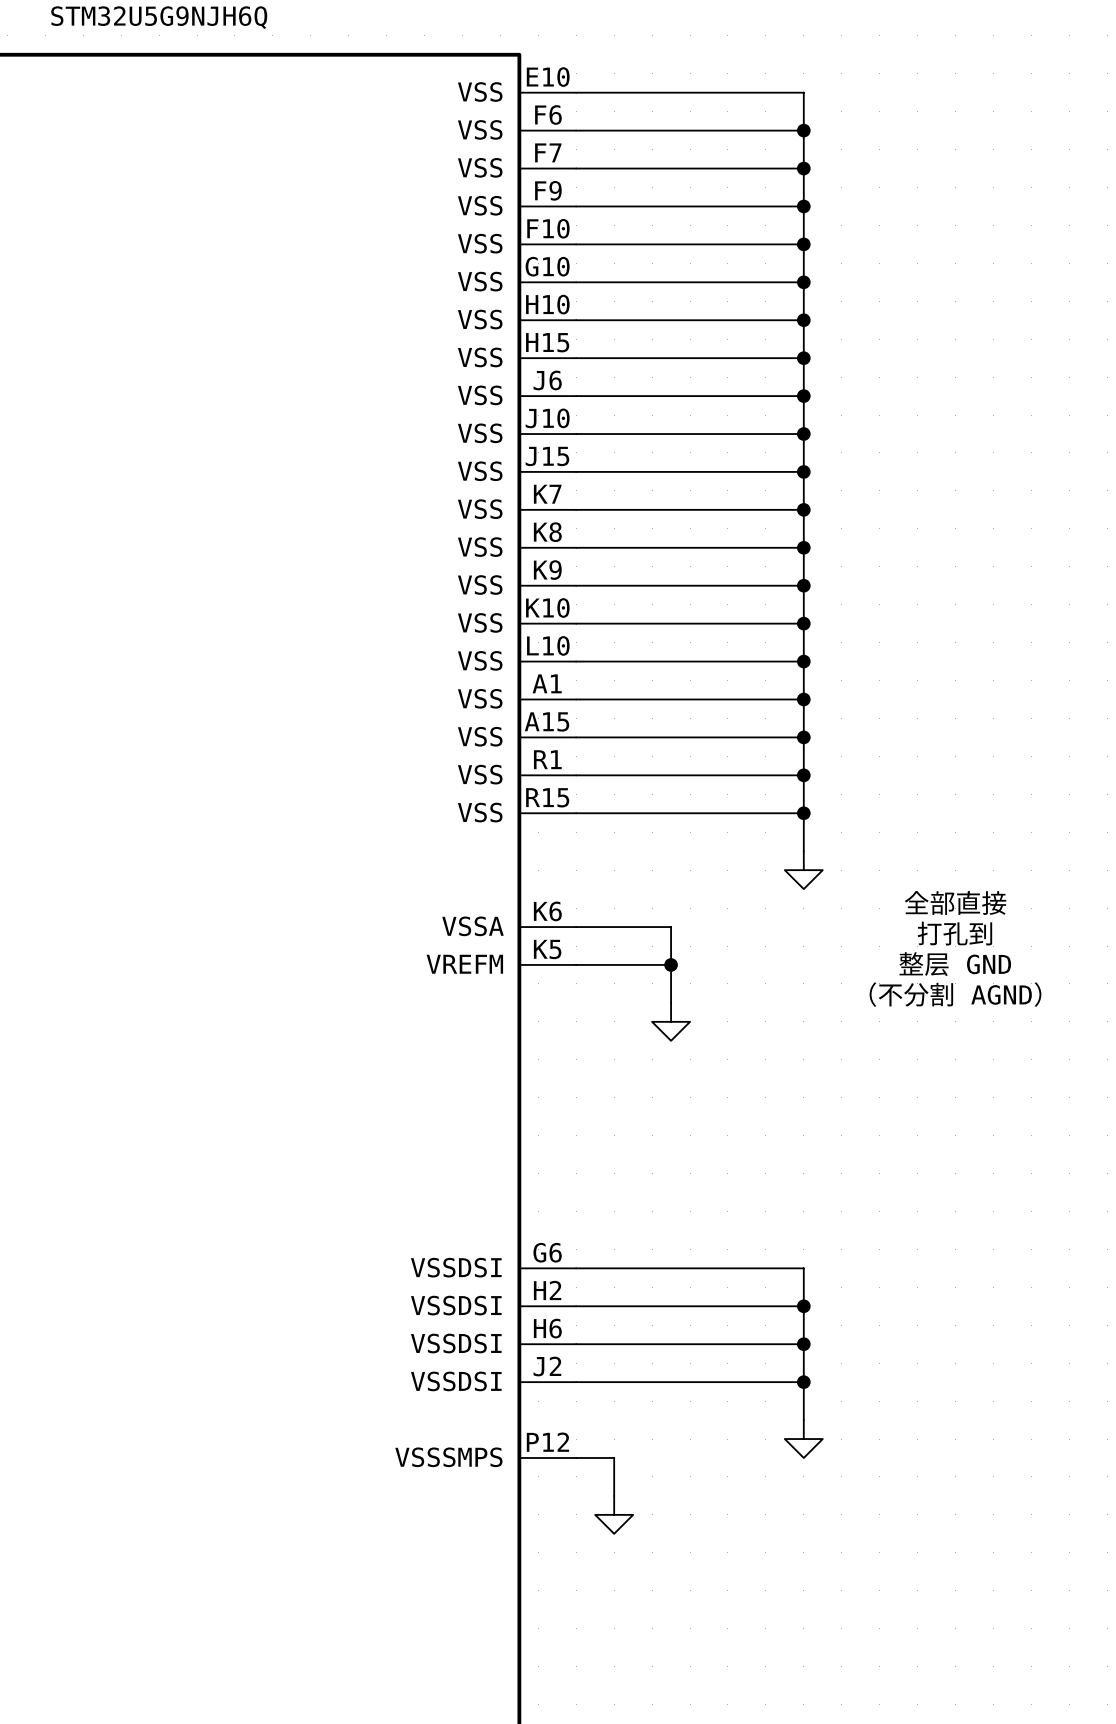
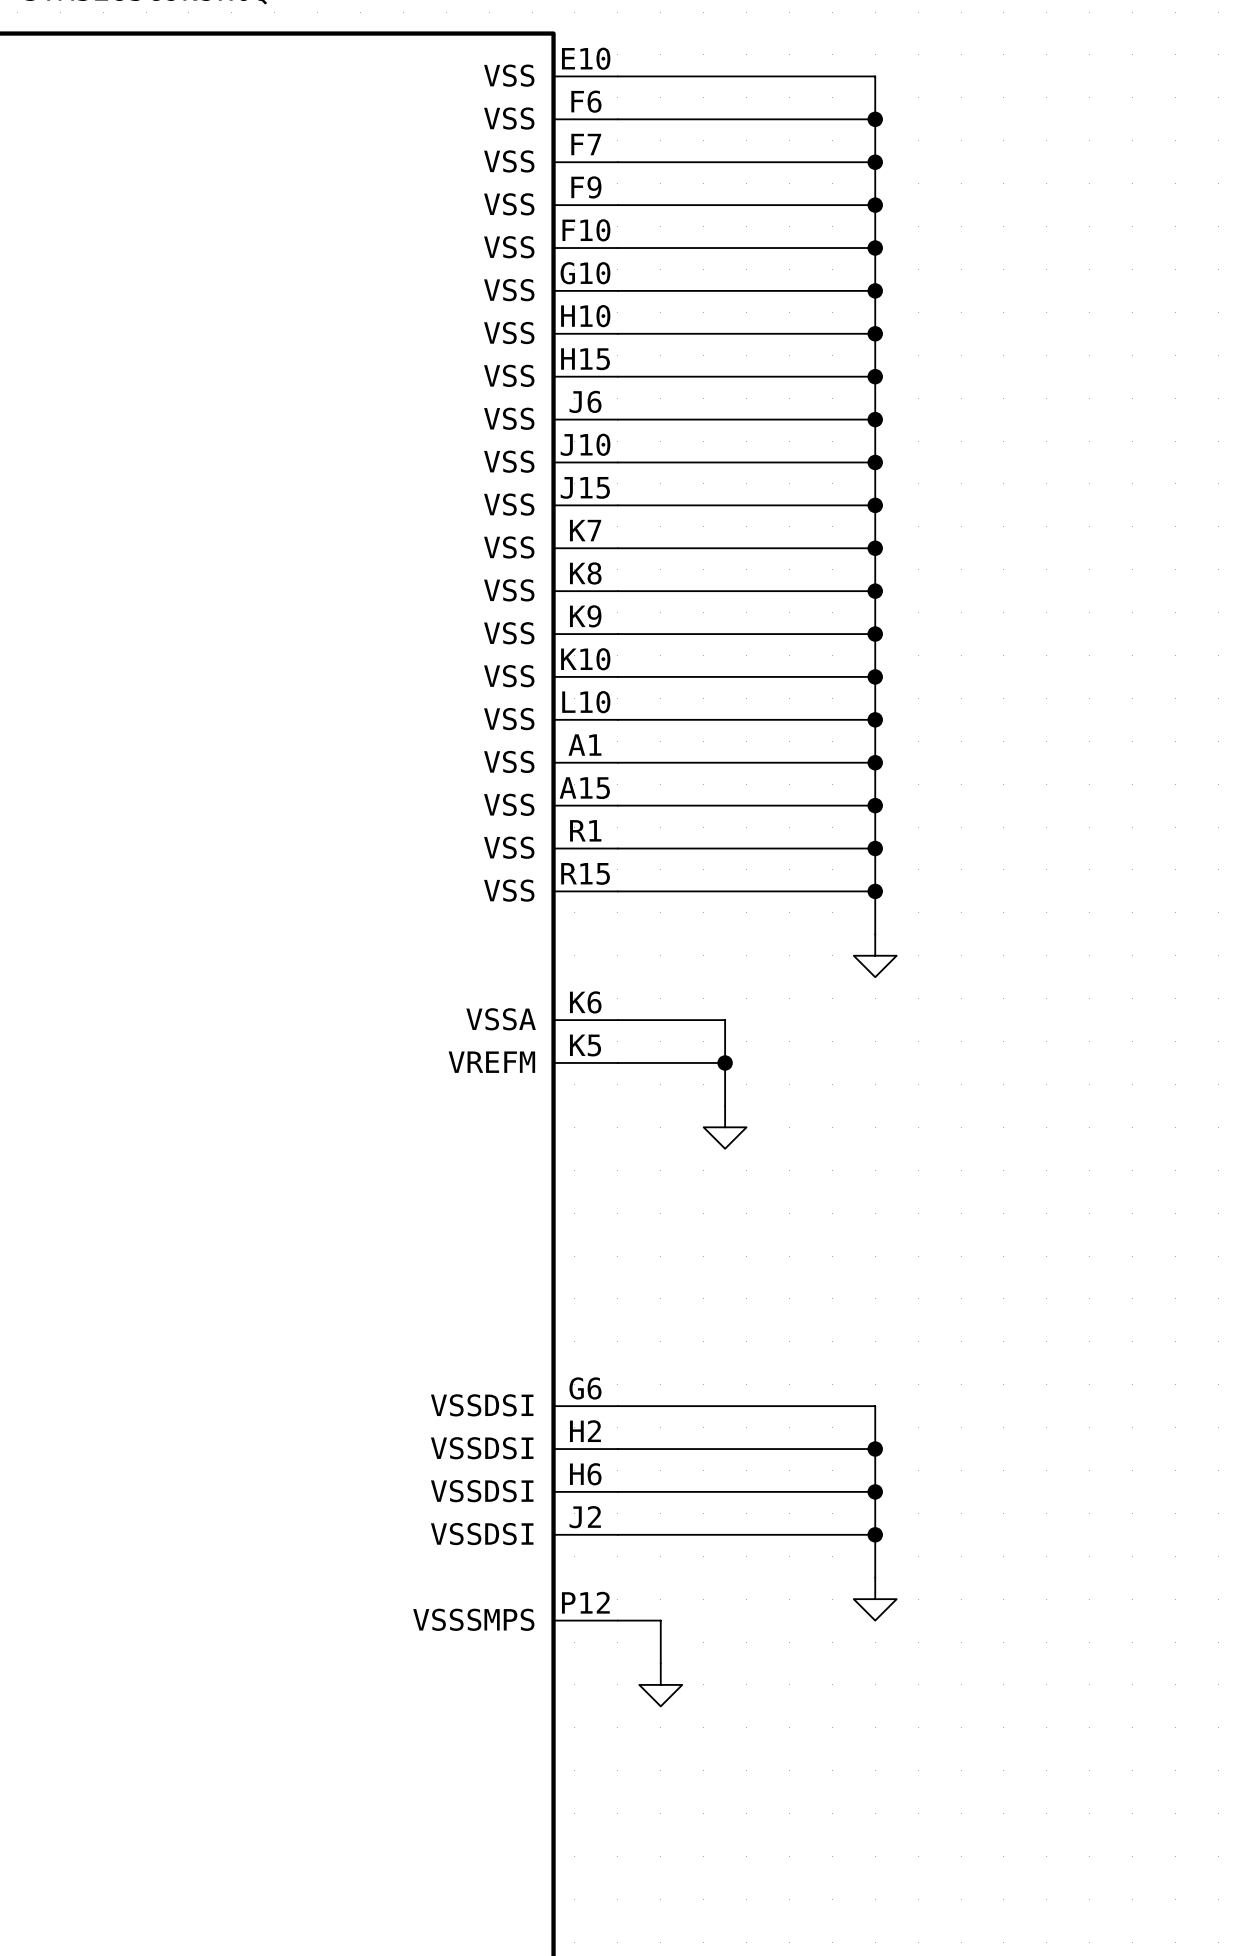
text: 全部直接 (955, 902) -> none
text: 打孔到 (954, 933) -> none
text: 整层 GND (955, 964) -> none
text: （不分割 AGND） (955, 994) -> none

